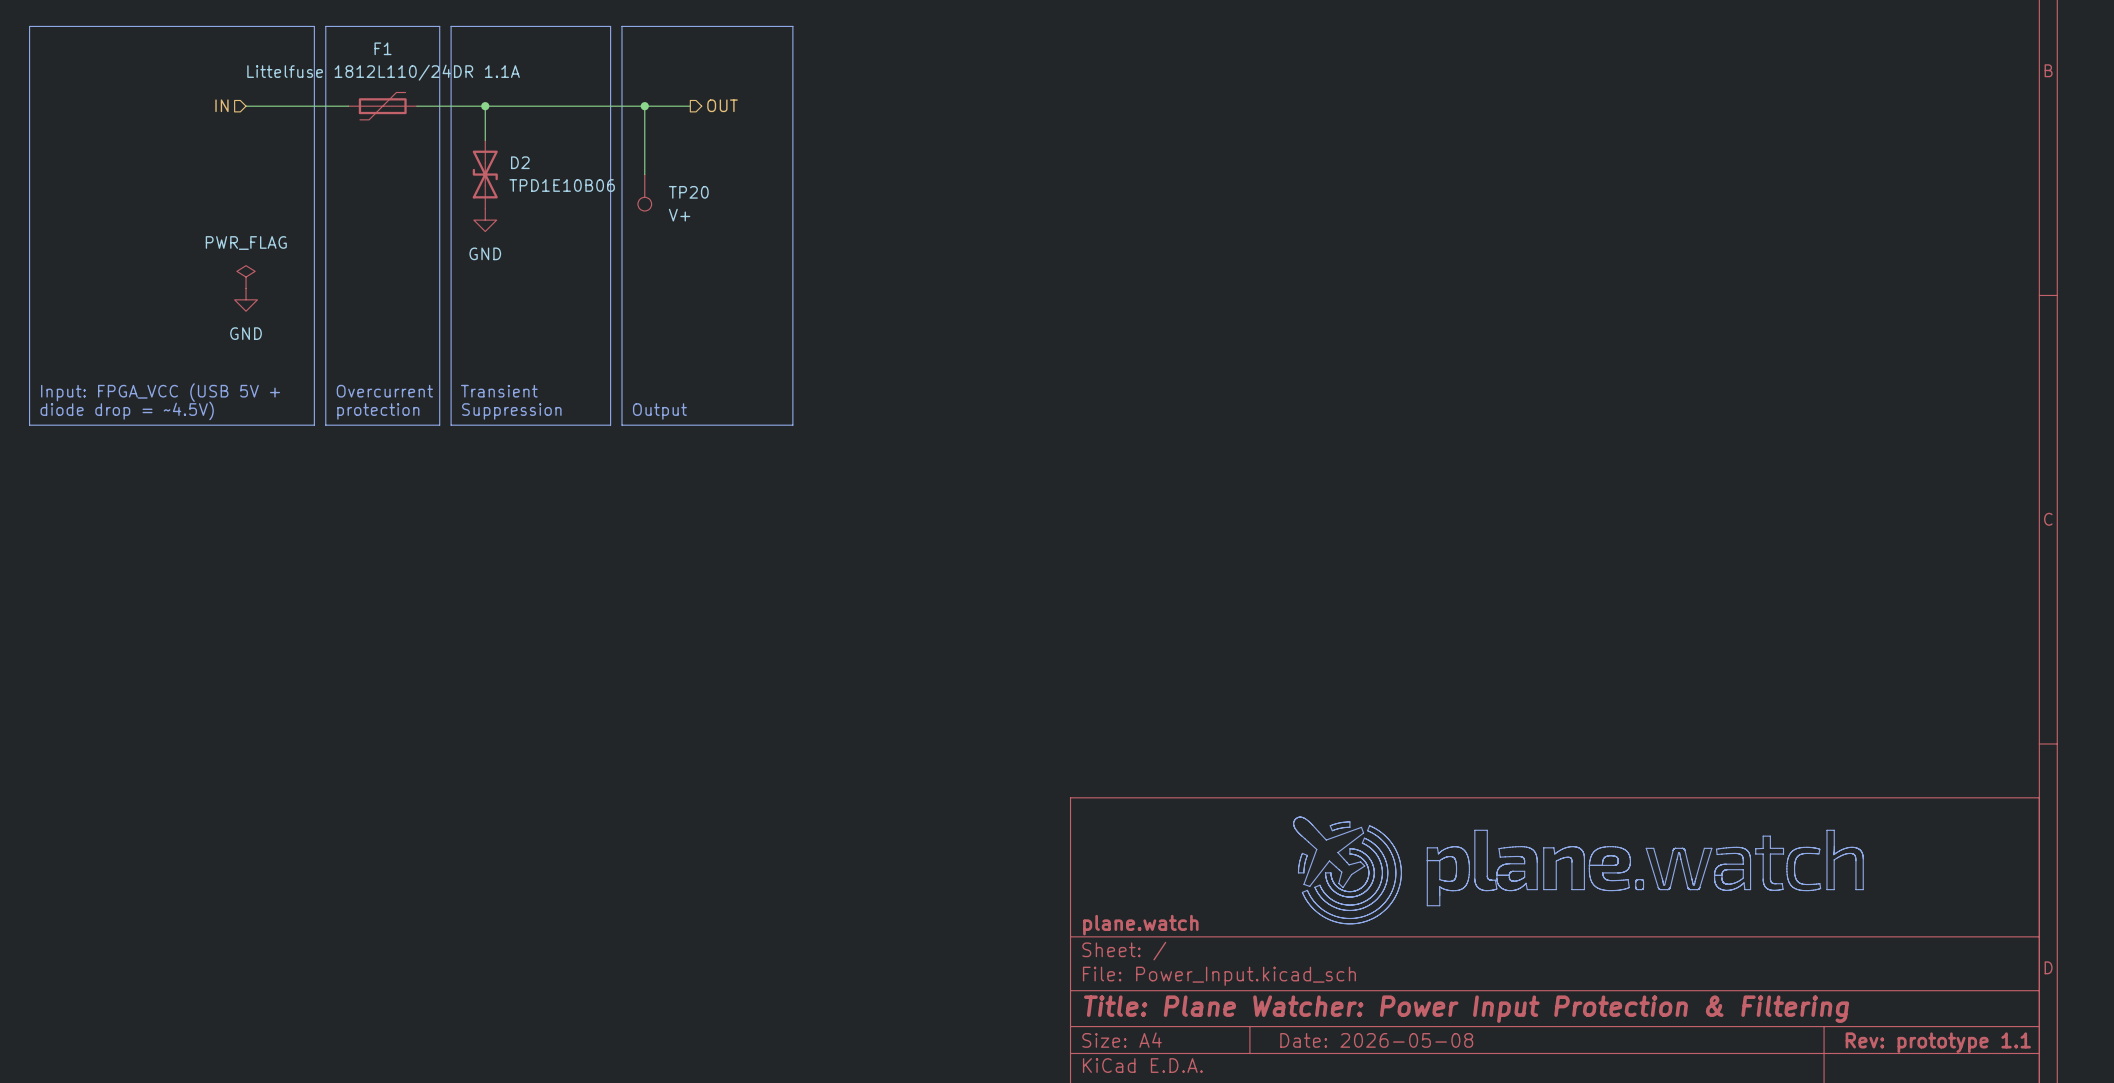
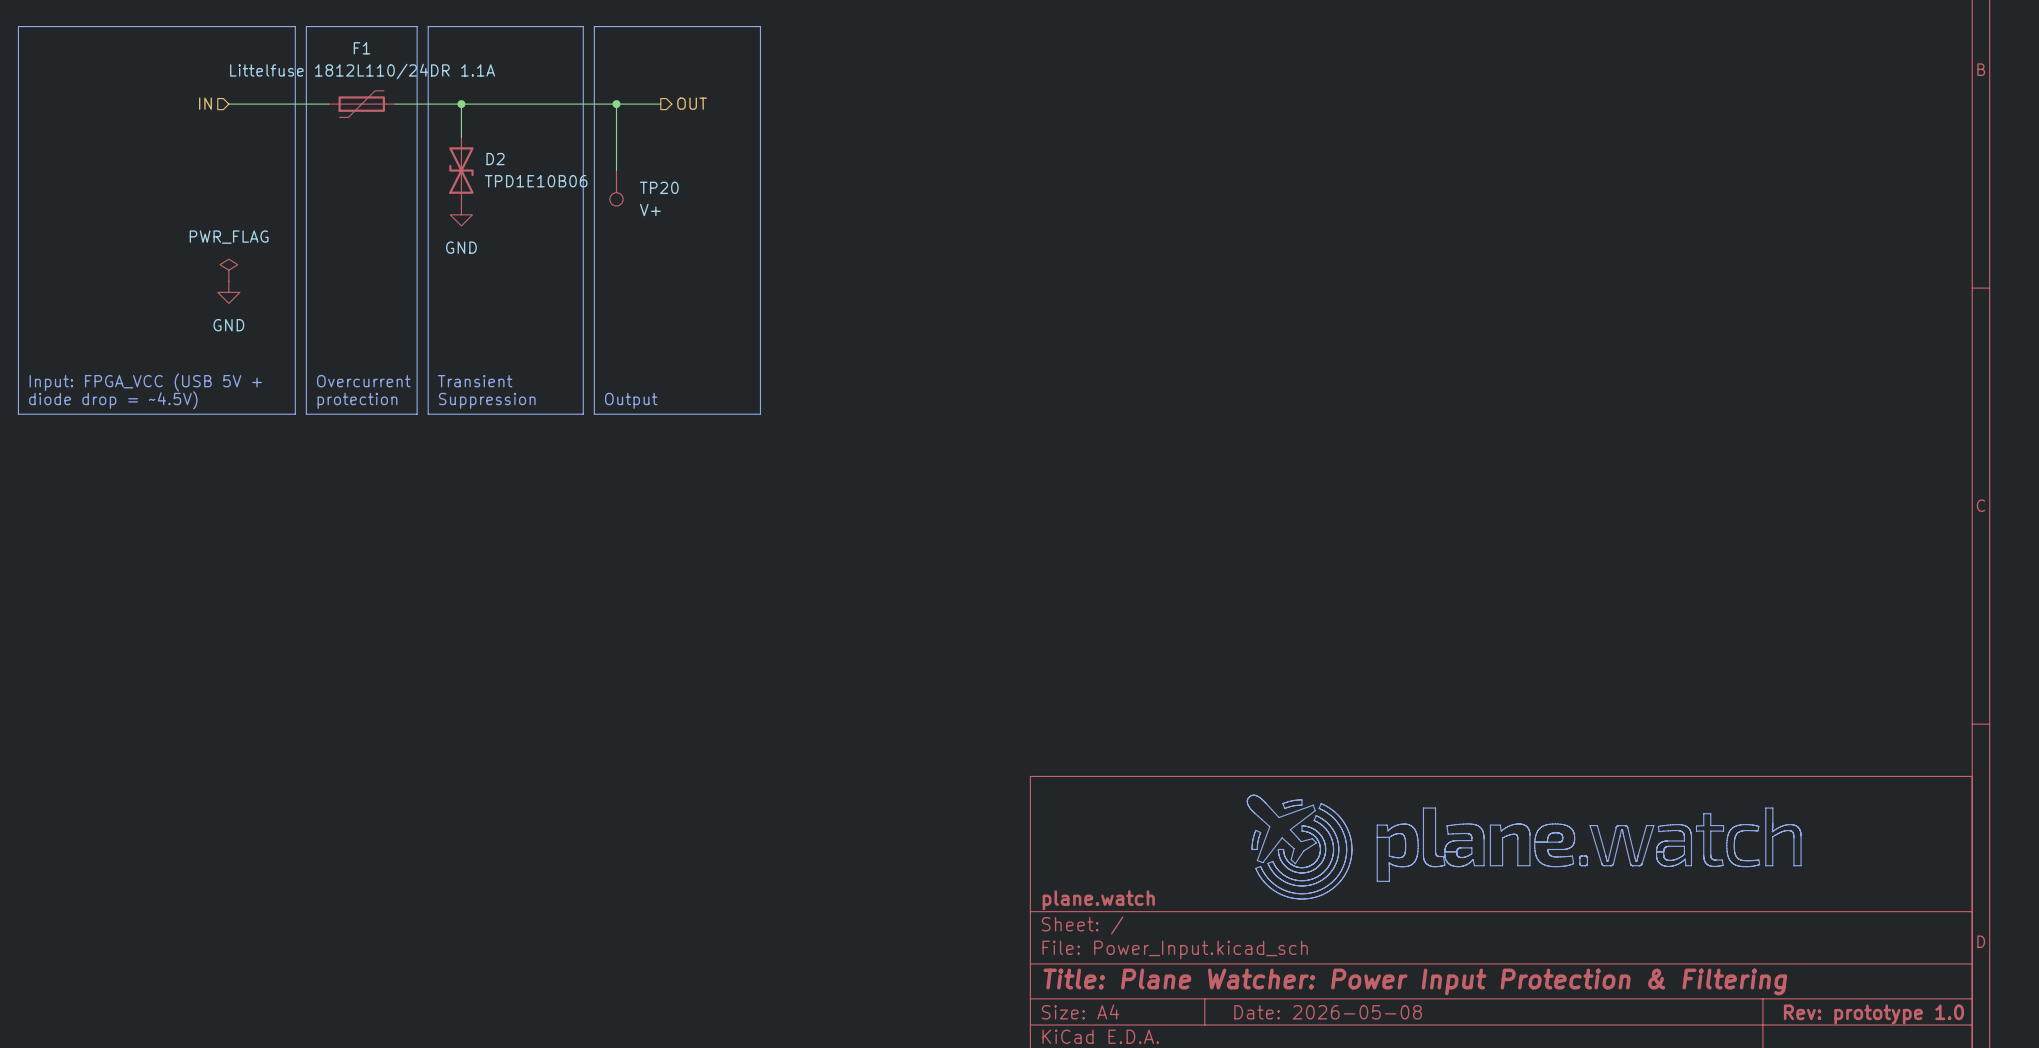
title block: Rev: prototype 1.1 (1938, 1042) -> Rev: prototype 1.0 (1873, 1014)

